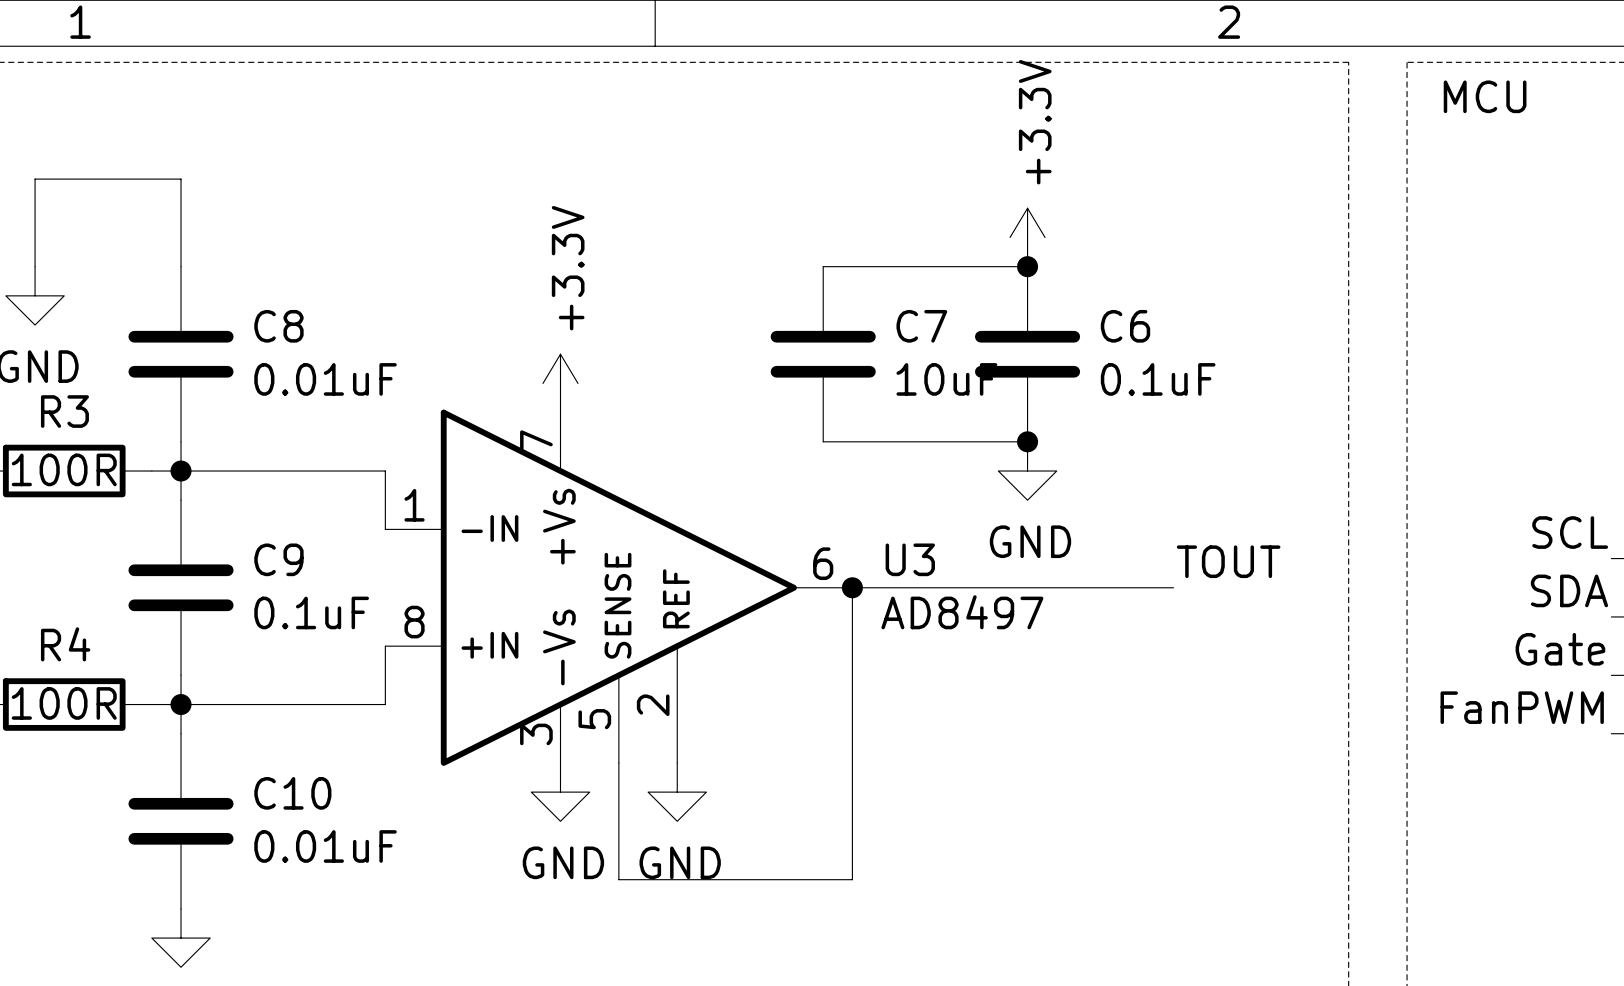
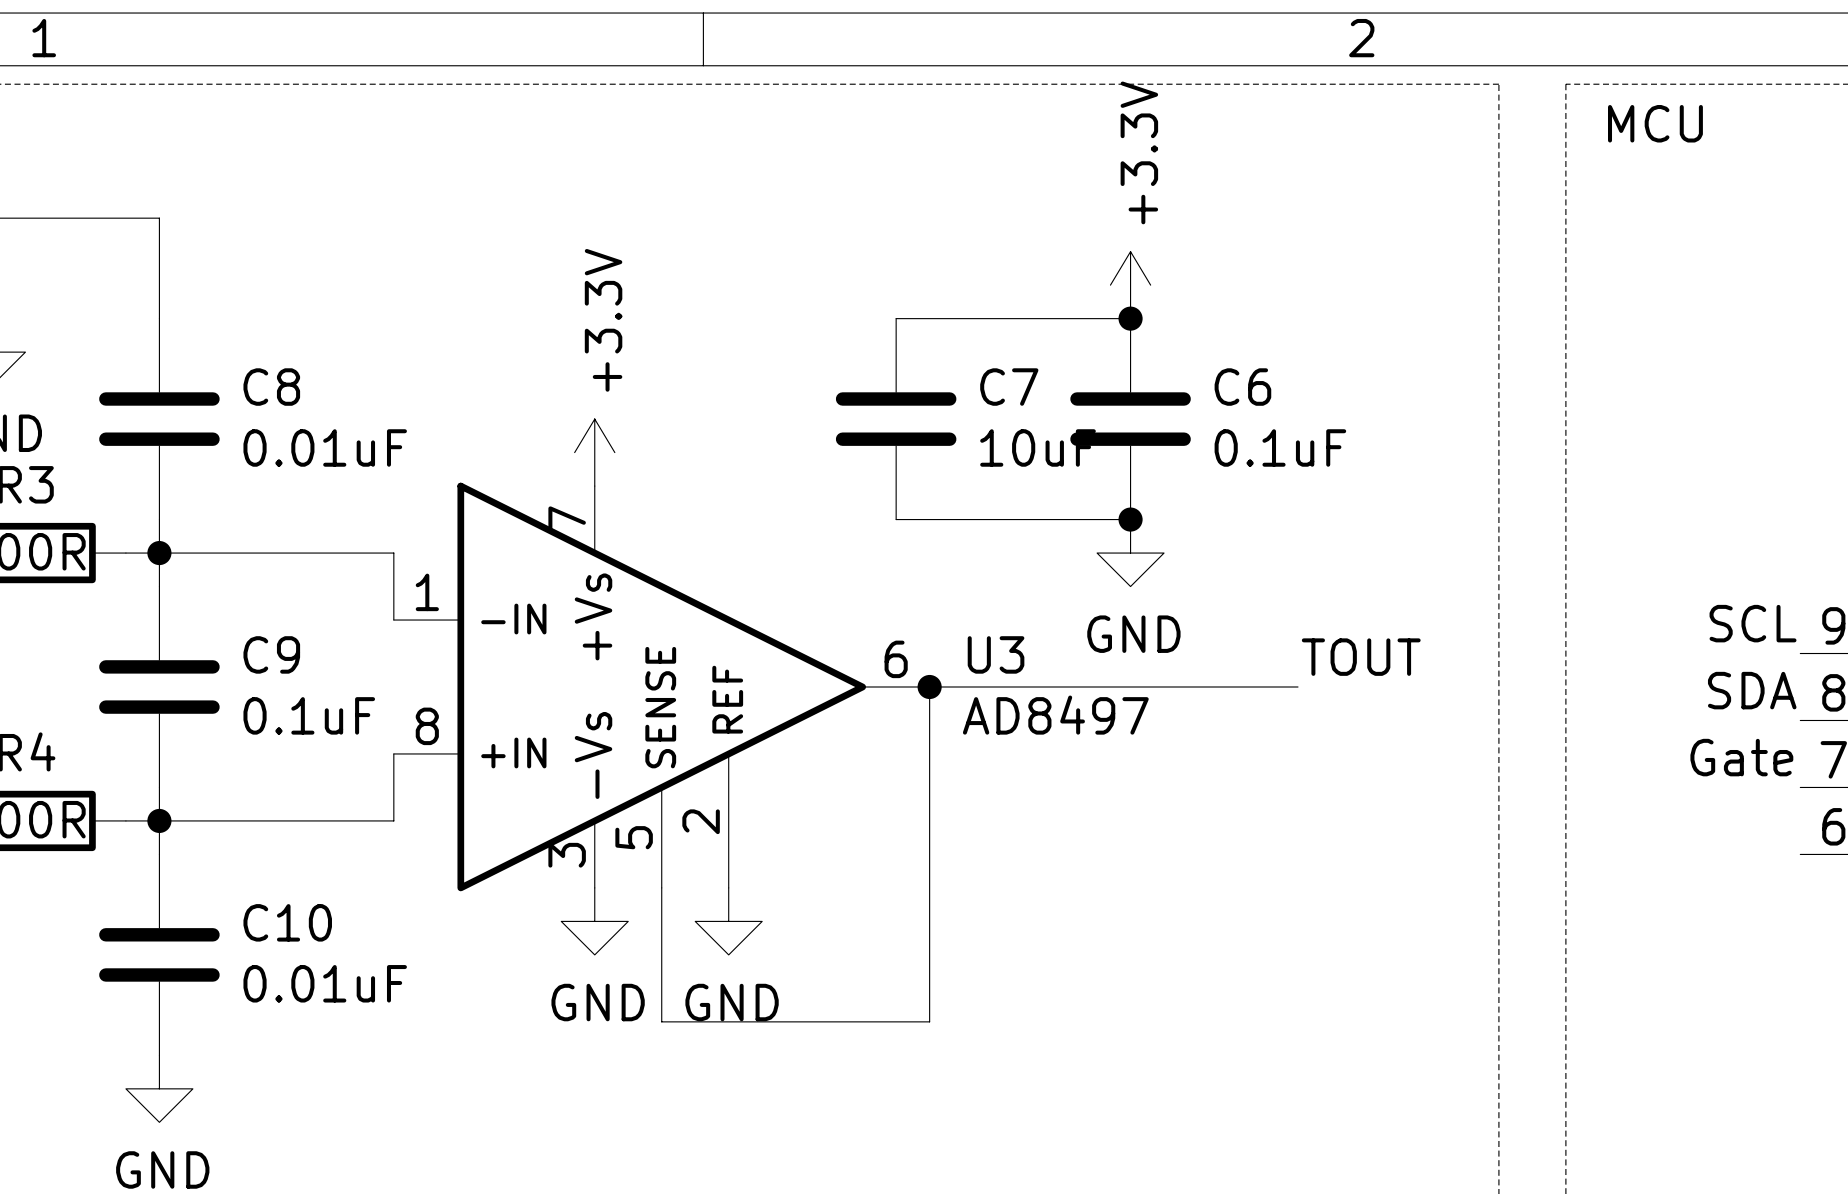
label: FanPWM (1522, 707) -> none

